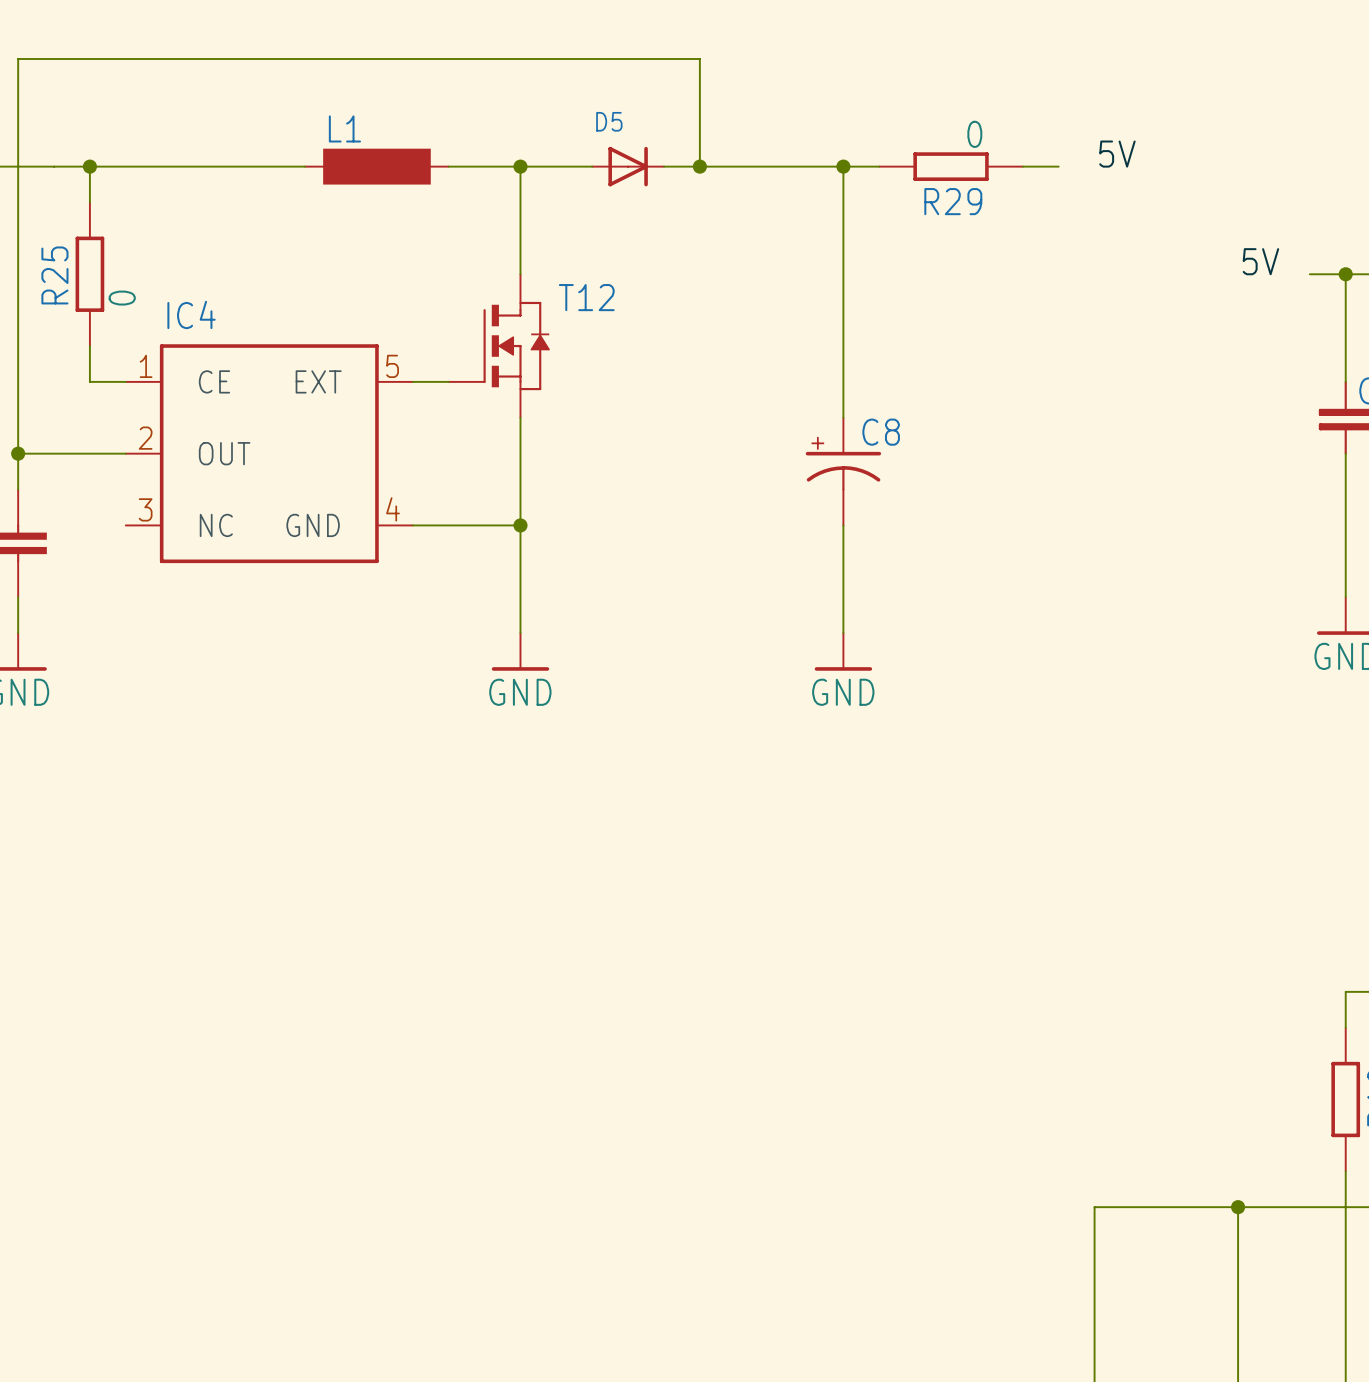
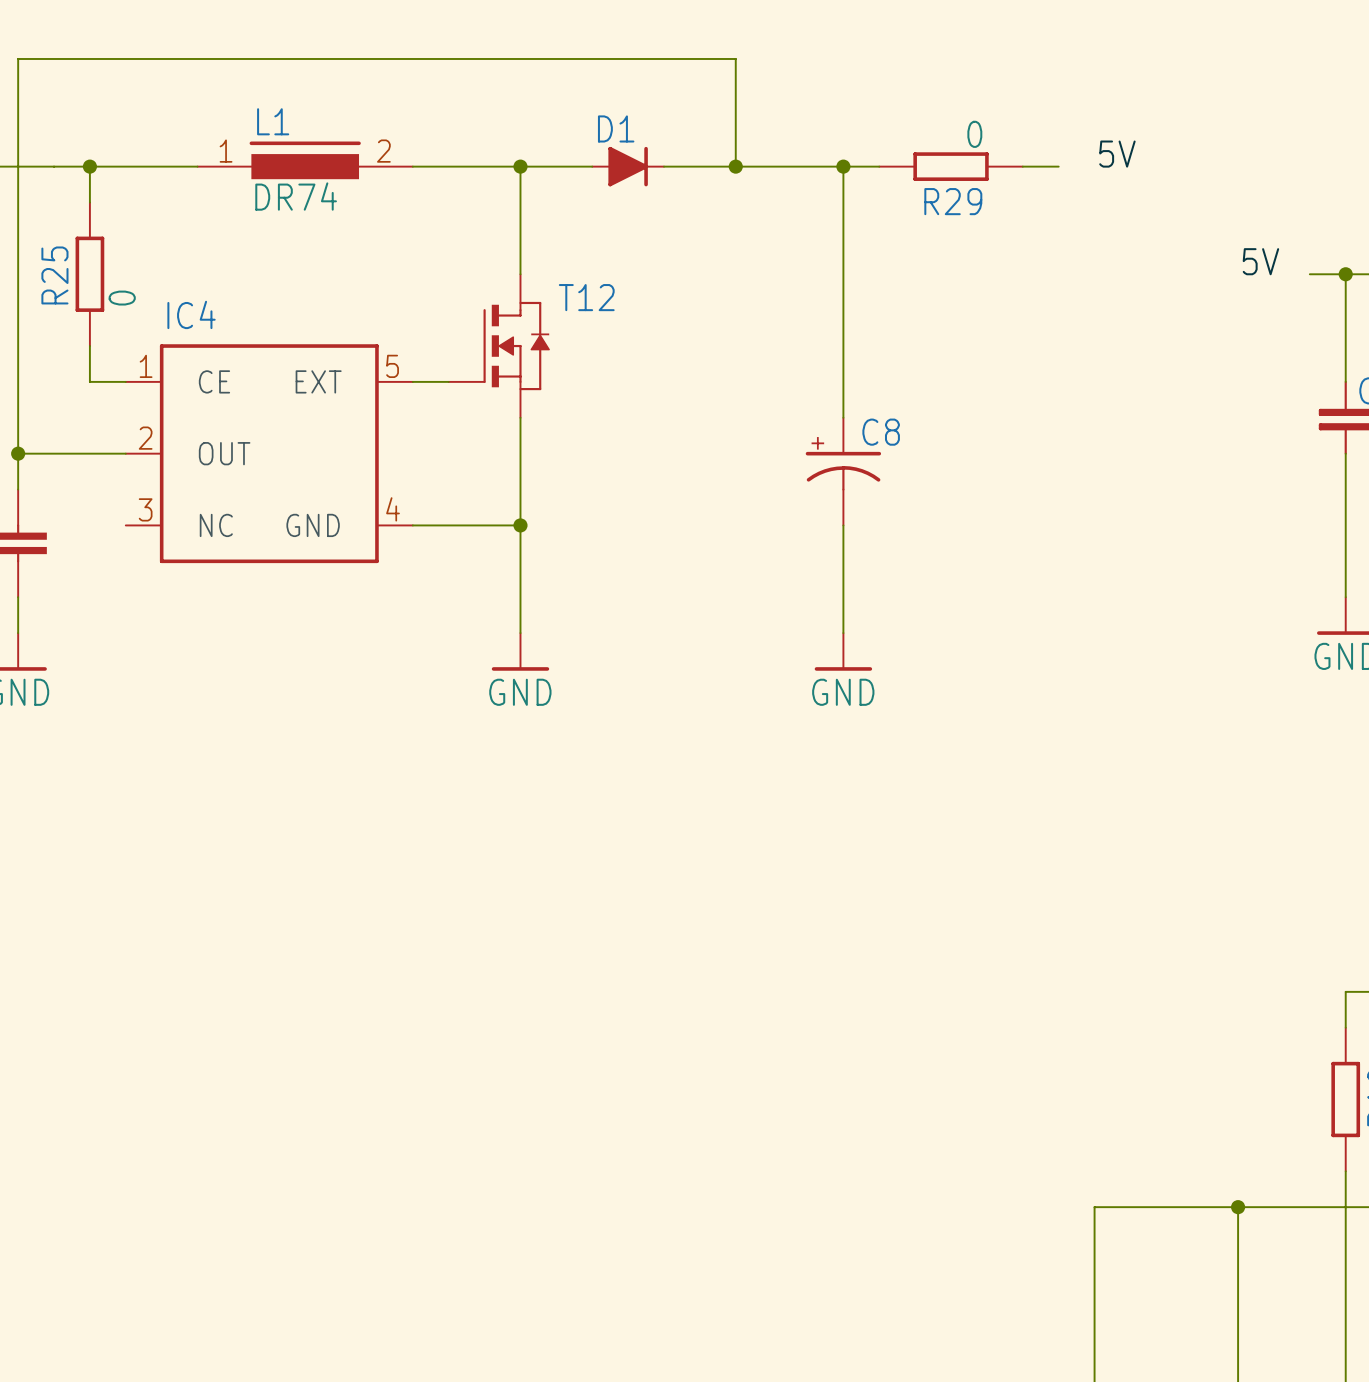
wire: (699, 58) (699, 166) -> (699, 58) (735, 58) (735, 166)
L1 symbol: [305, 148, 449, 185] -> [197, 141, 413, 180]
D5: (628, 166) -> none
D1: none -> (628, 166)
junction position: (699, 166) -> (735, 166)
L1 value: none -> DR74 (296, 196)

